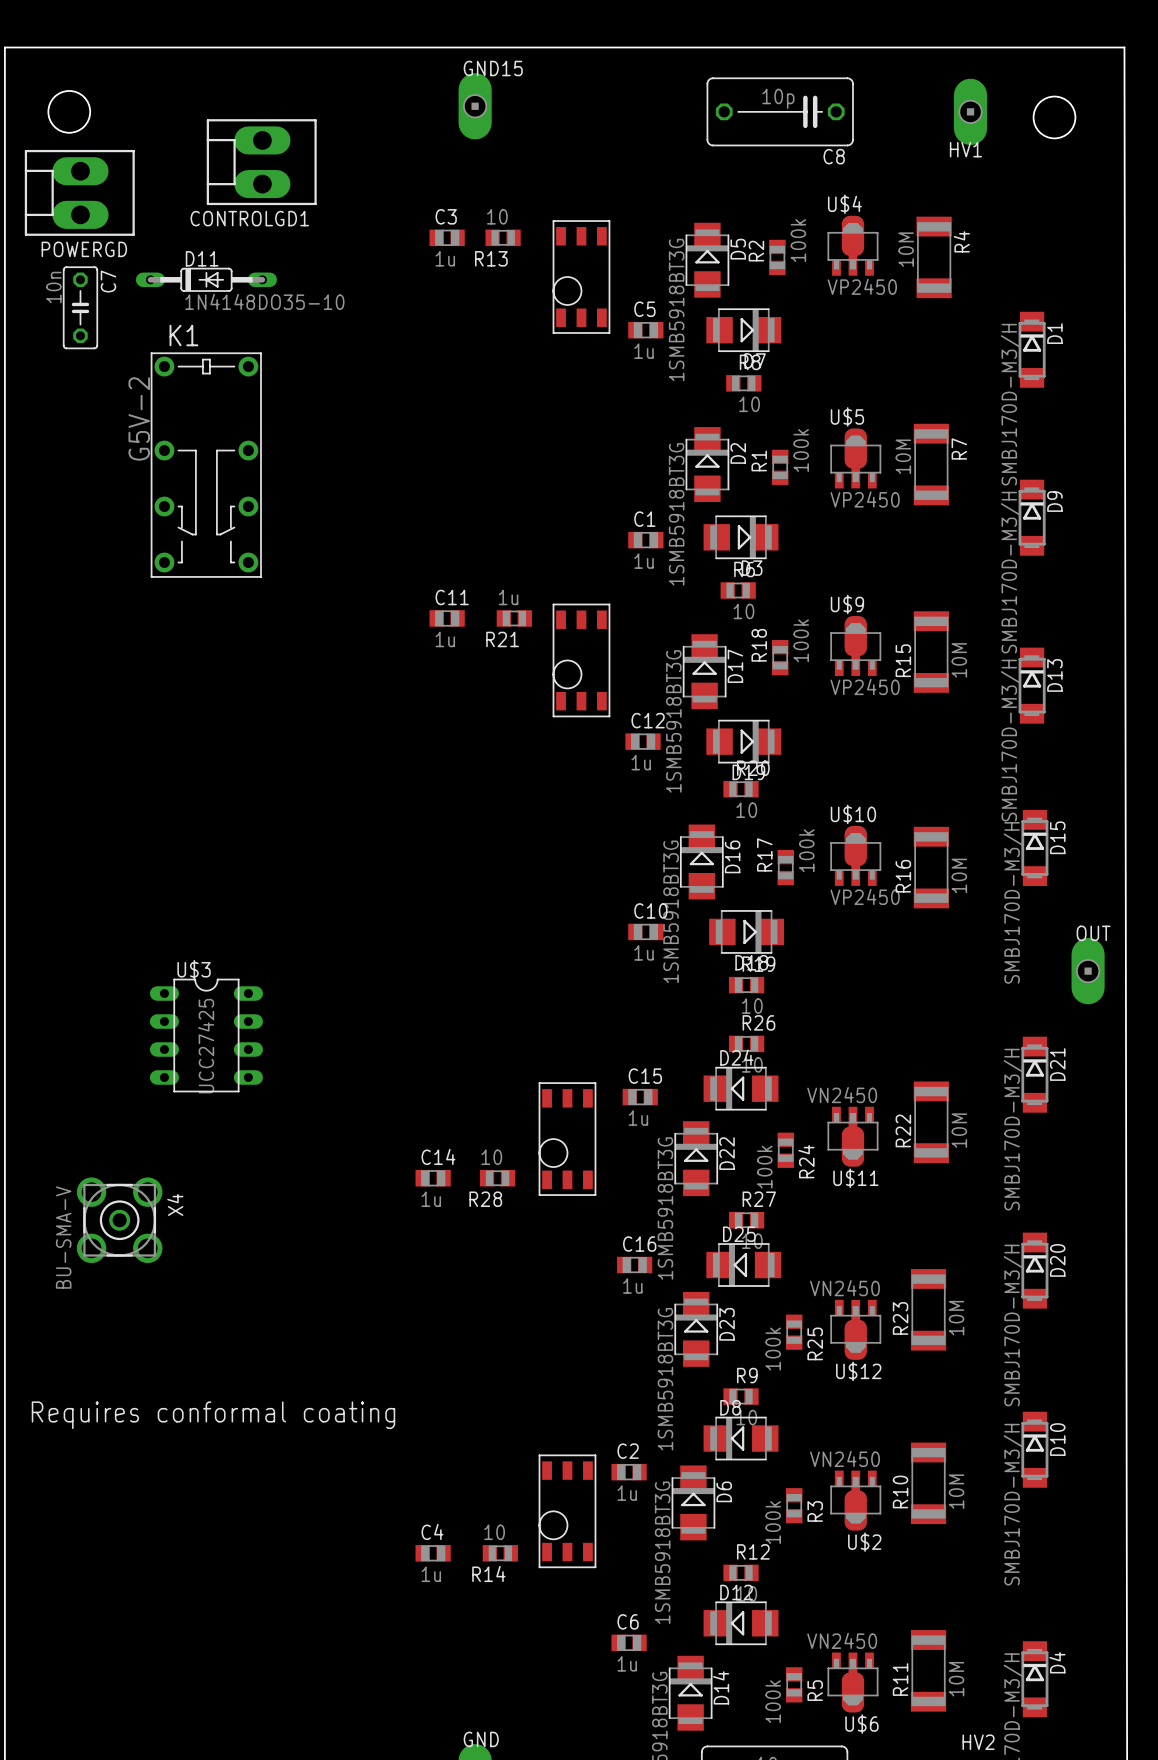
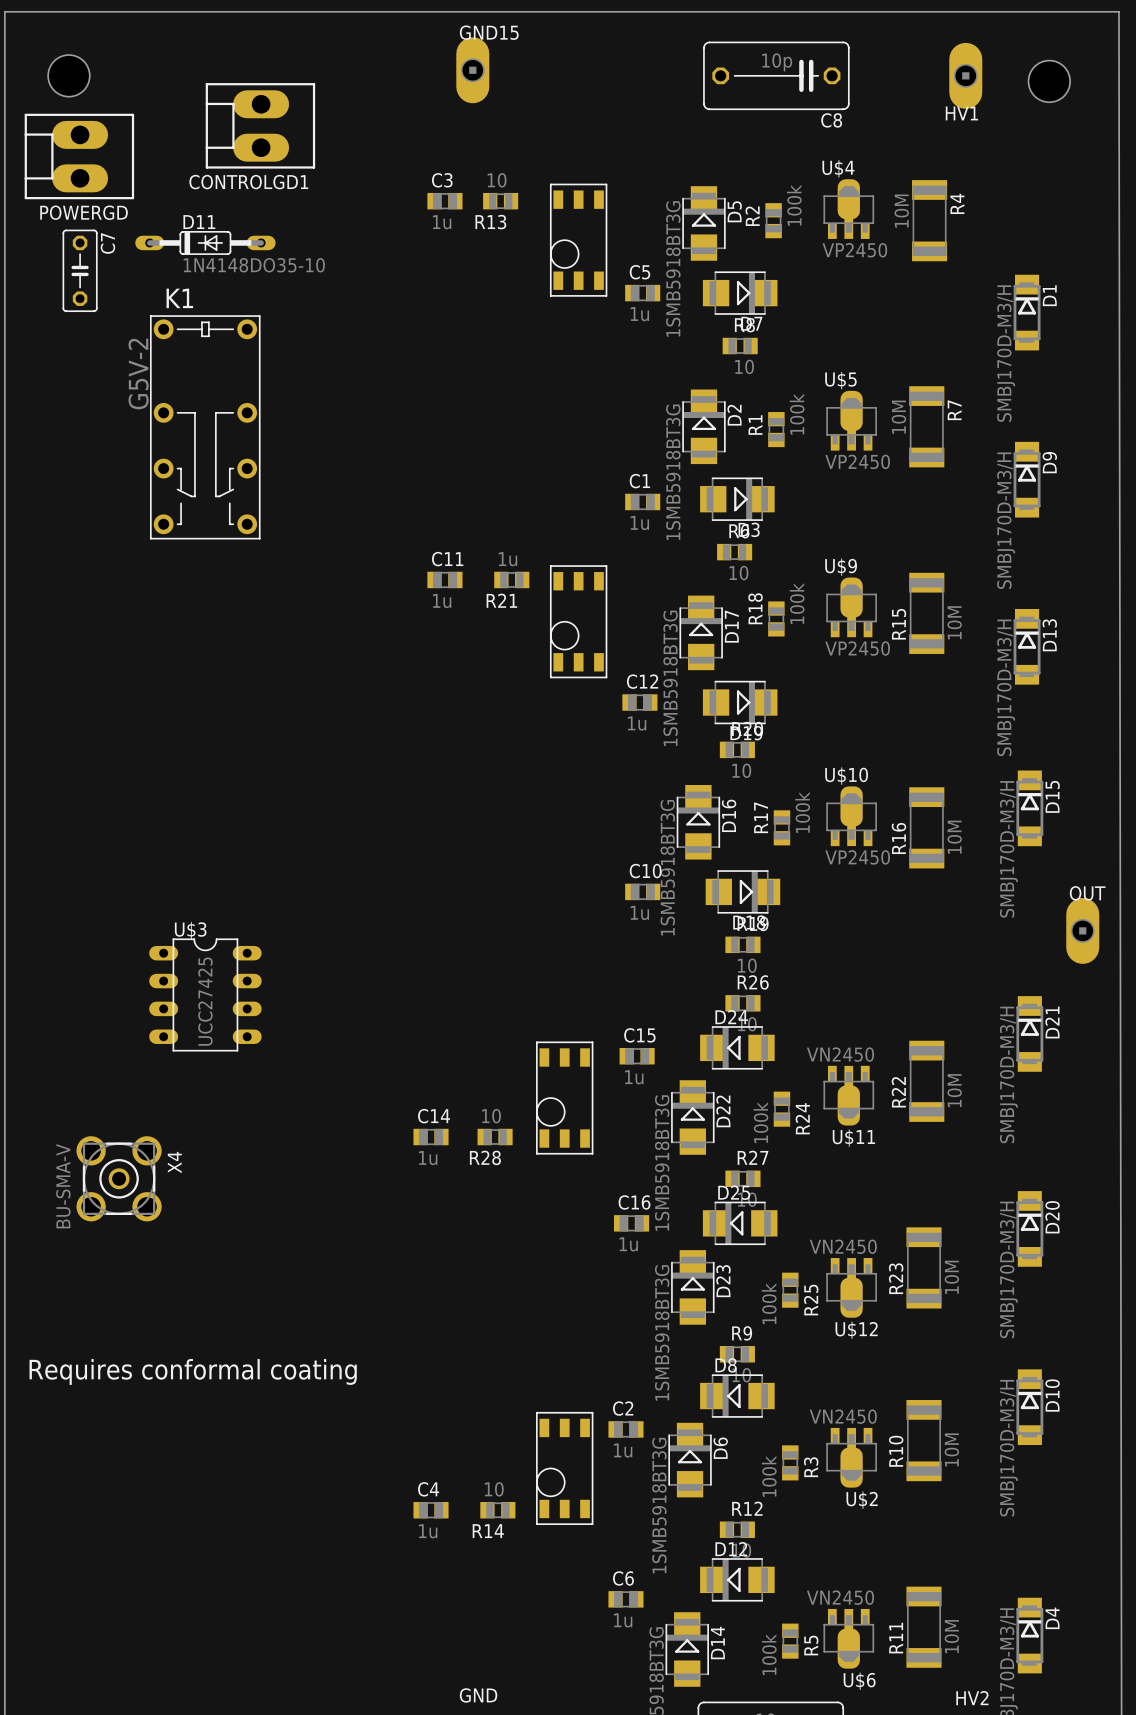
C7 value: 10n (53, 287) -> none

